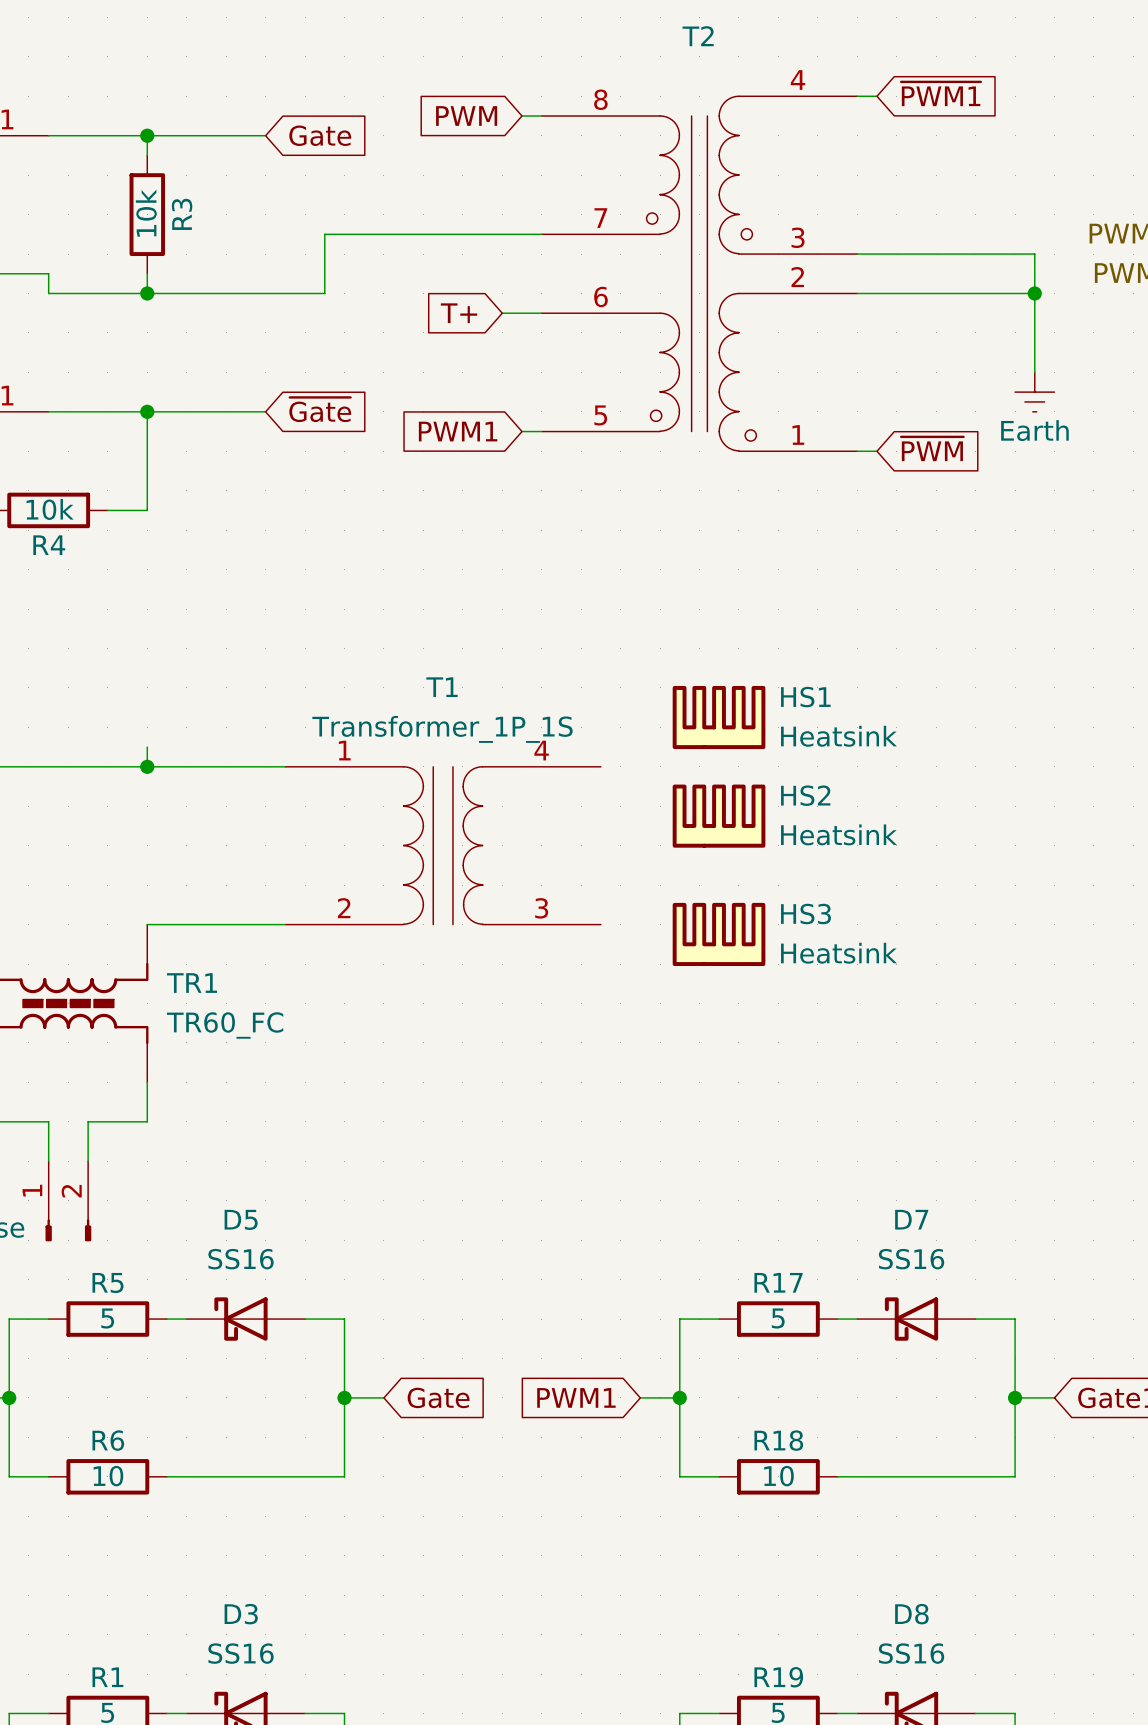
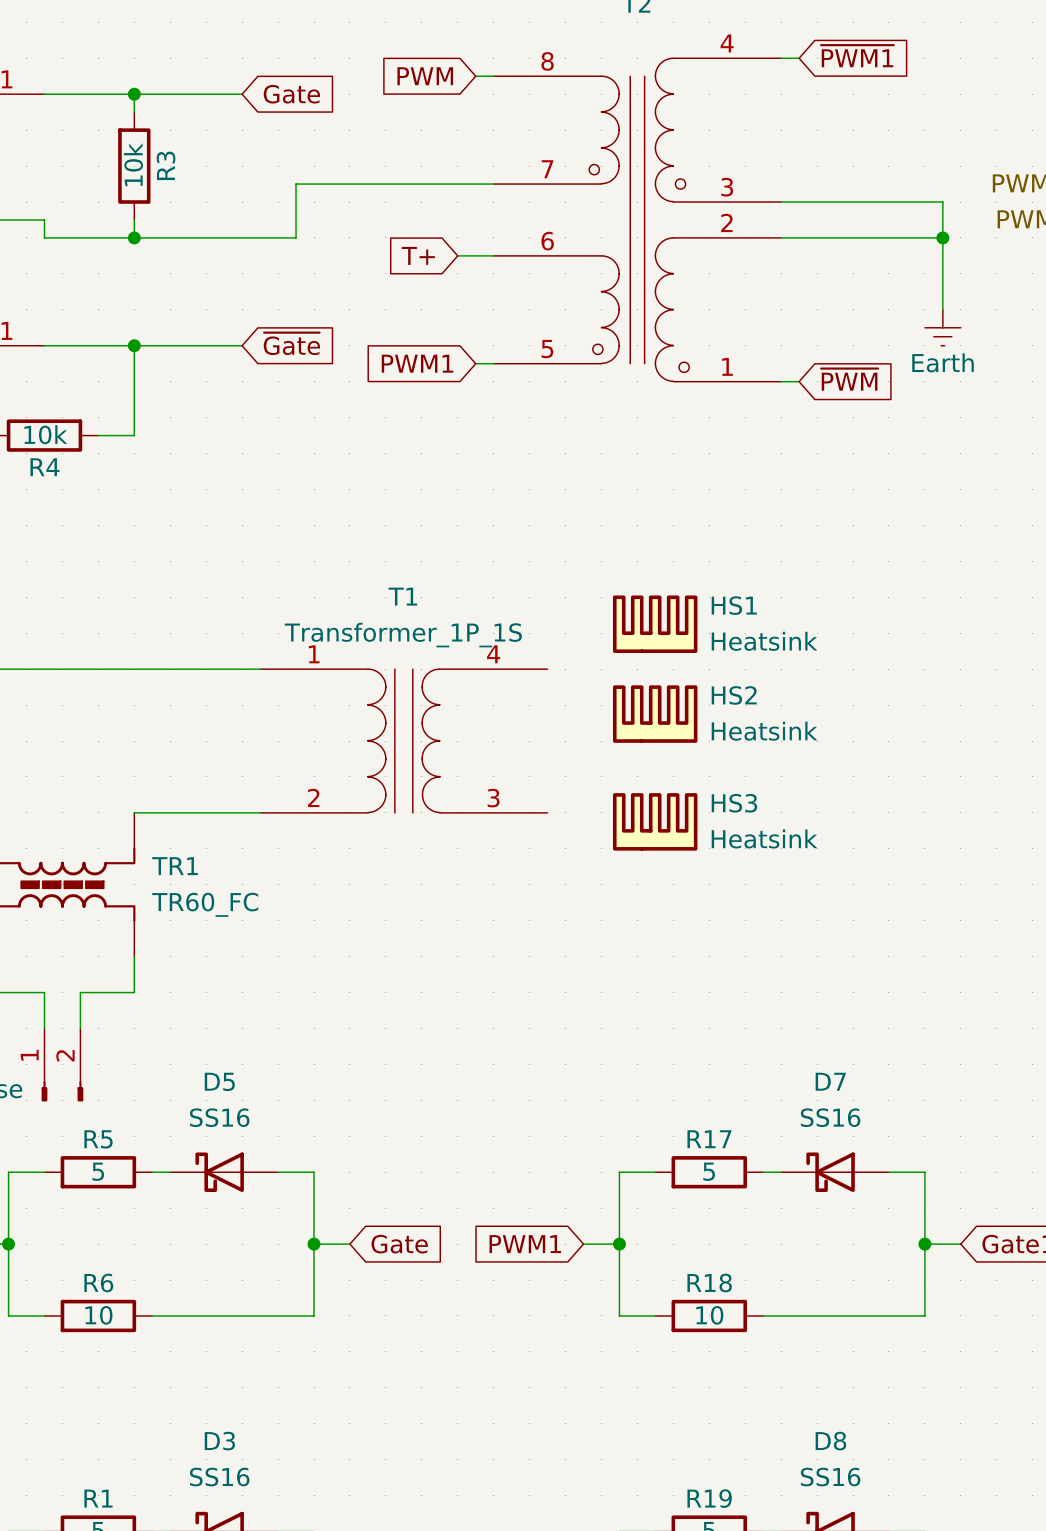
wire: (147, 747) (147, 766) -> none
junction: (147, 766) -> none

